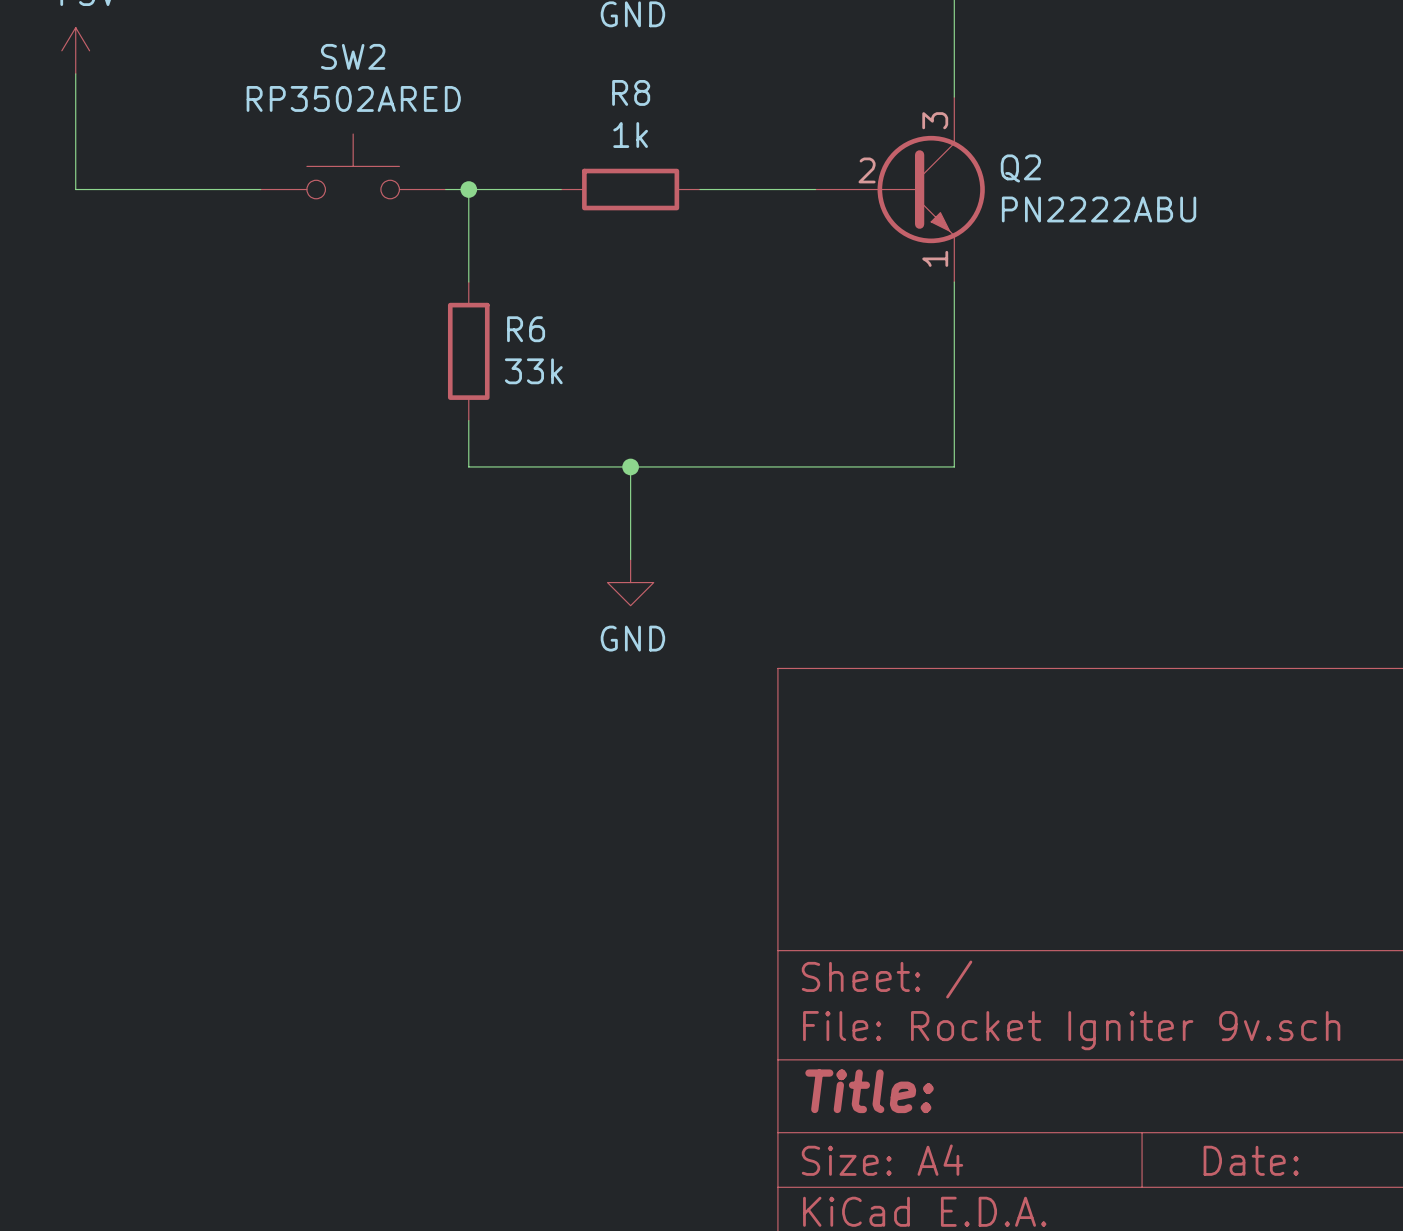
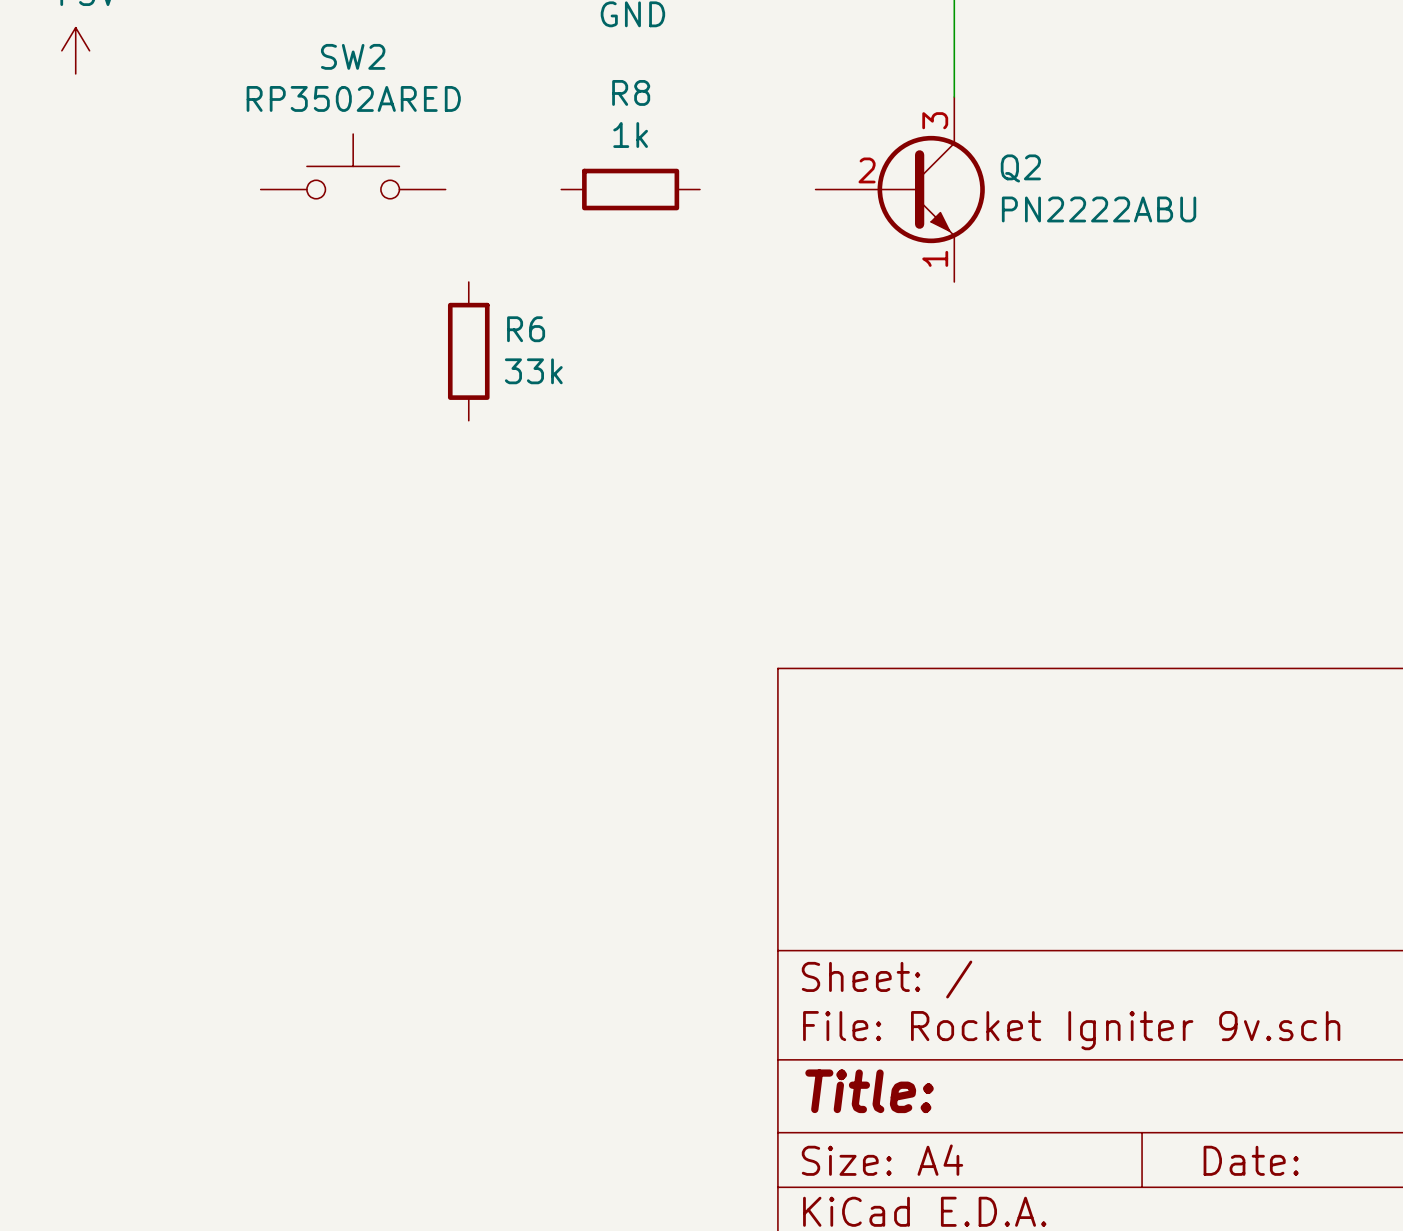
wire: (75, 73) (75, 189) (260, 189) -> none
wire: (445, 189) (561, 189) -> none
wire: (468, 189) (468, 282) -> none
junction: (468, 189) -> none
wire: (699, 189) (815, 189) -> none
wire: (954, 282) (954, 466) (468, 466) (468, 420) -> none
wire: (630, 466) (630, 559) -> none
junction: (630, 466) -> none
power symbol: GND (630, 582) -> none

